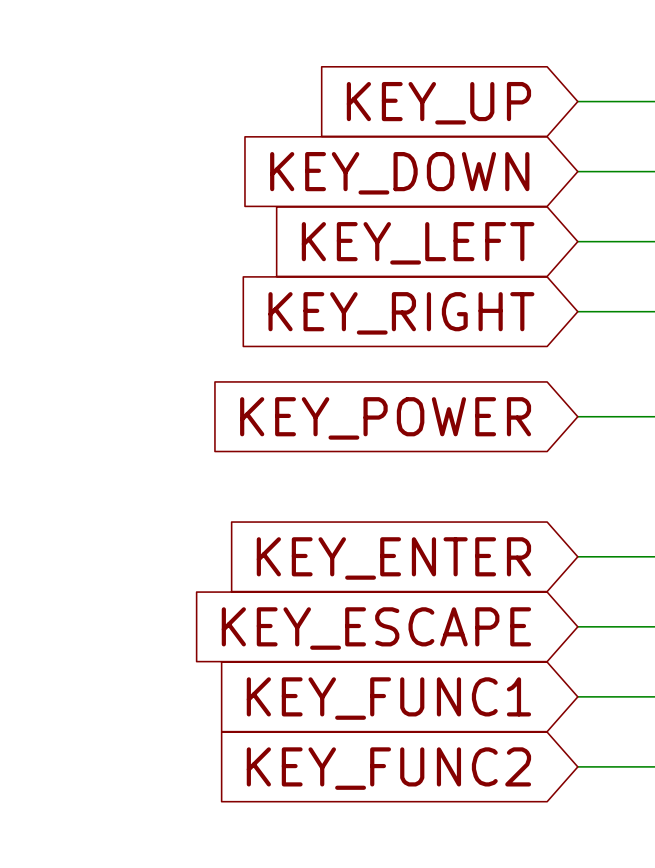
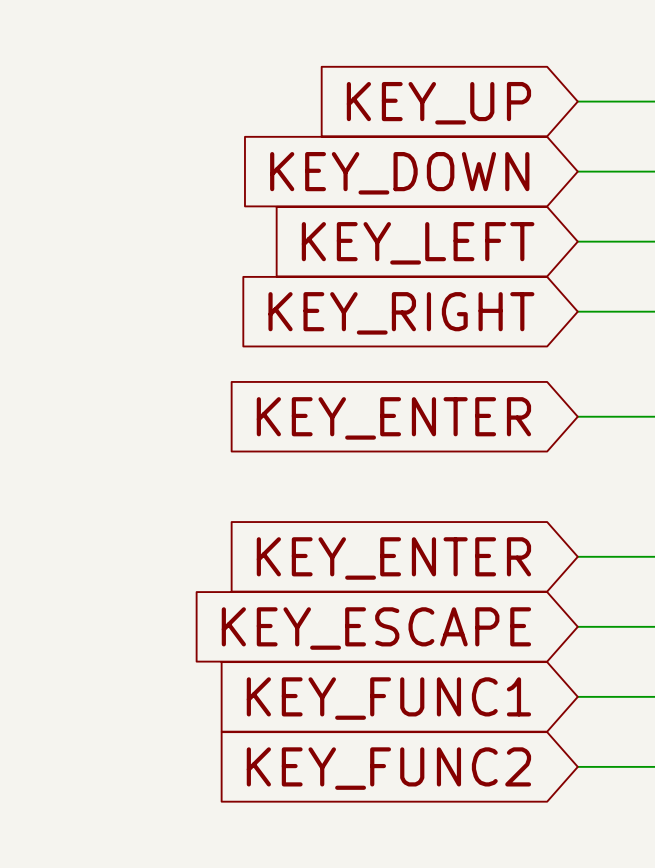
global label: KEY_POWER (385, 418) -> KEY_ENTER (393, 418)

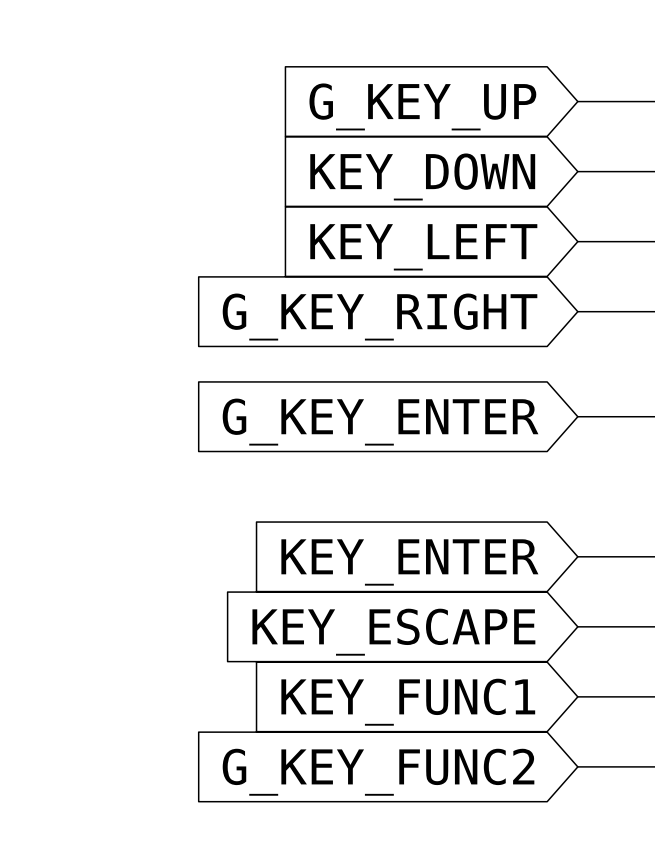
global label: KEY_UP (438, 103) -> G_KEY_UP (422, 106)
global label: KEY_RIGHT (401, 313) -> G_KEY_RIGHT (380, 317)
global label: KEY_ENTER (393, 418) -> G_KEY_ENTER (380, 422)
global label: KEY_FUNC2 (388, 768) -> G_KEY_FUNC2 (378, 772)

